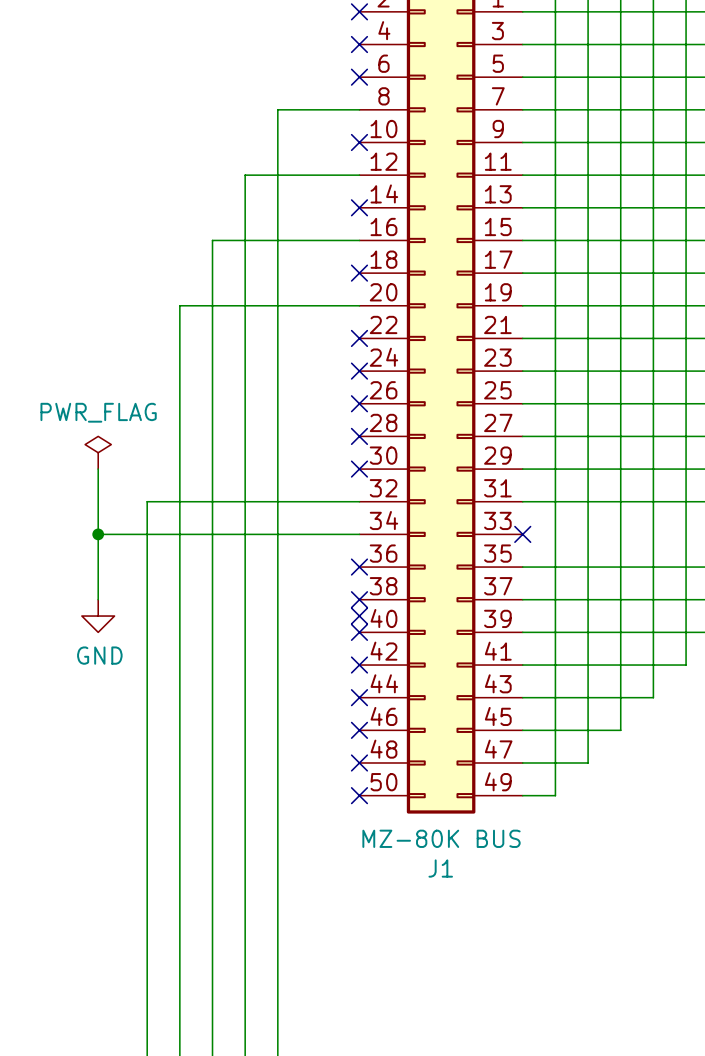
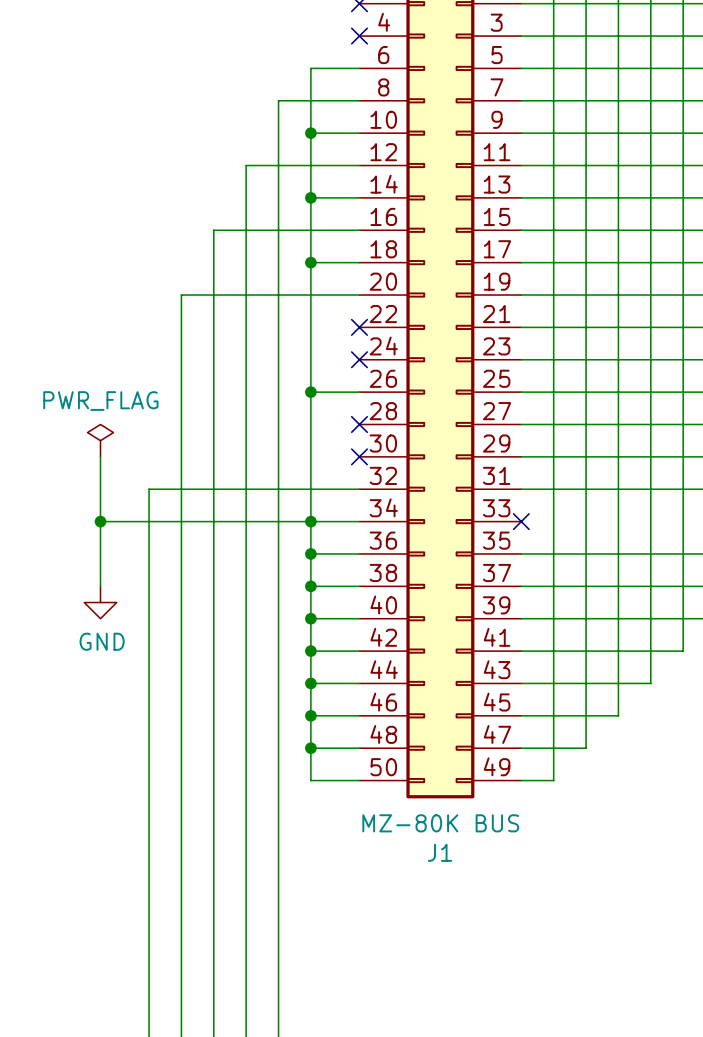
wire: none -> (359, 68) (310, 68) (310, 780) (359, 780)
no-connect mark: (359, 77) -> none
wire: none -> (310, 133) (359, 133)
junction: none -> (310, 133)
no-connect mark: (359, 142) -> none
wire: none -> (310, 197) (359, 197)
junction: none -> (310, 197)
no-connect mark: (359, 207) -> none
wire: none -> (310, 262) (359, 262)
junction: none -> (310, 262)
no-connect mark: (359, 273) -> none
wire: none -> (310, 392) (359, 392)
junction: none -> (310, 392)
no-connect mark: (359, 403) -> none
junction: none -> (310, 521)
wire: none -> (310, 553) (359, 553)
junction: none -> (310, 553)
no-connect mark: (359, 567) -> none
wire: none -> (310, 586) (359, 586)
junction: none -> (310, 586)
no-connect mark: (359, 599) -> none
no-connect mark: (359, 616) -> none
wire: none -> (310, 618) (359, 618)
junction: none -> (310, 618)
no-connect mark: (359, 632) -> none
wire: none -> (310, 651) (359, 651)
junction: none -> (310, 651)
no-connect mark: (359, 665) -> none
wire: none -> (310, 683) (359, 683)
junction: none -> (310, 683)
no-connect mark: (359, 697) -> none
wire: none -> (310, 715) (359, 715)
junction: none -> (310, 715)
no-connect mark: (359, 730) -> none
wire: none -> (310, 748) (359, 748)
junction: none -> (310, 748)
no-connect mark: (359, 762) -> none
no-connect mark: (359, 795) -> none

